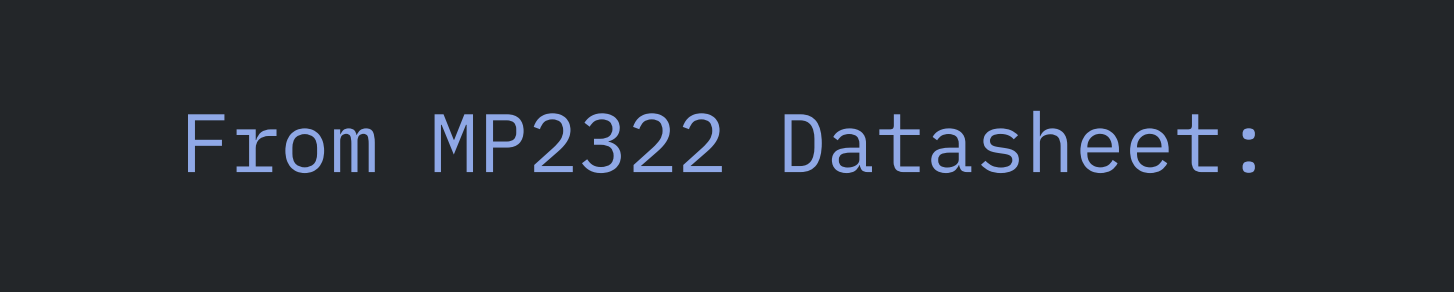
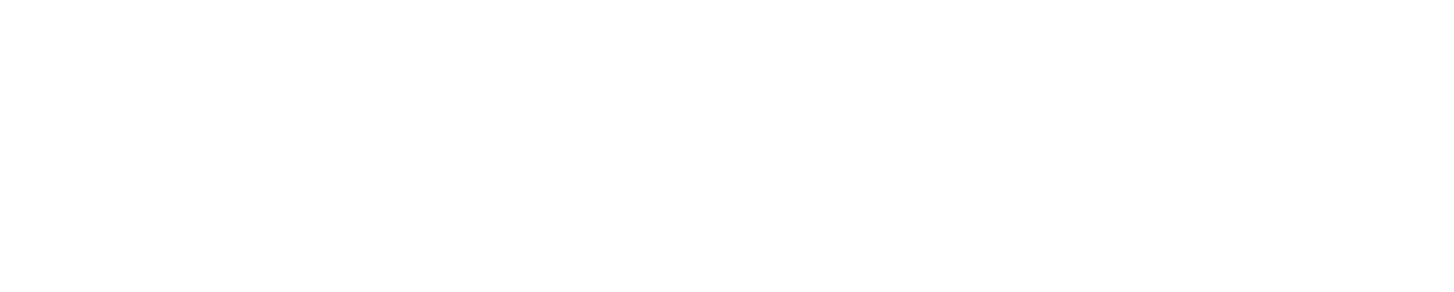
text: From MP2322 Datasheet: (721, 141) -> none

